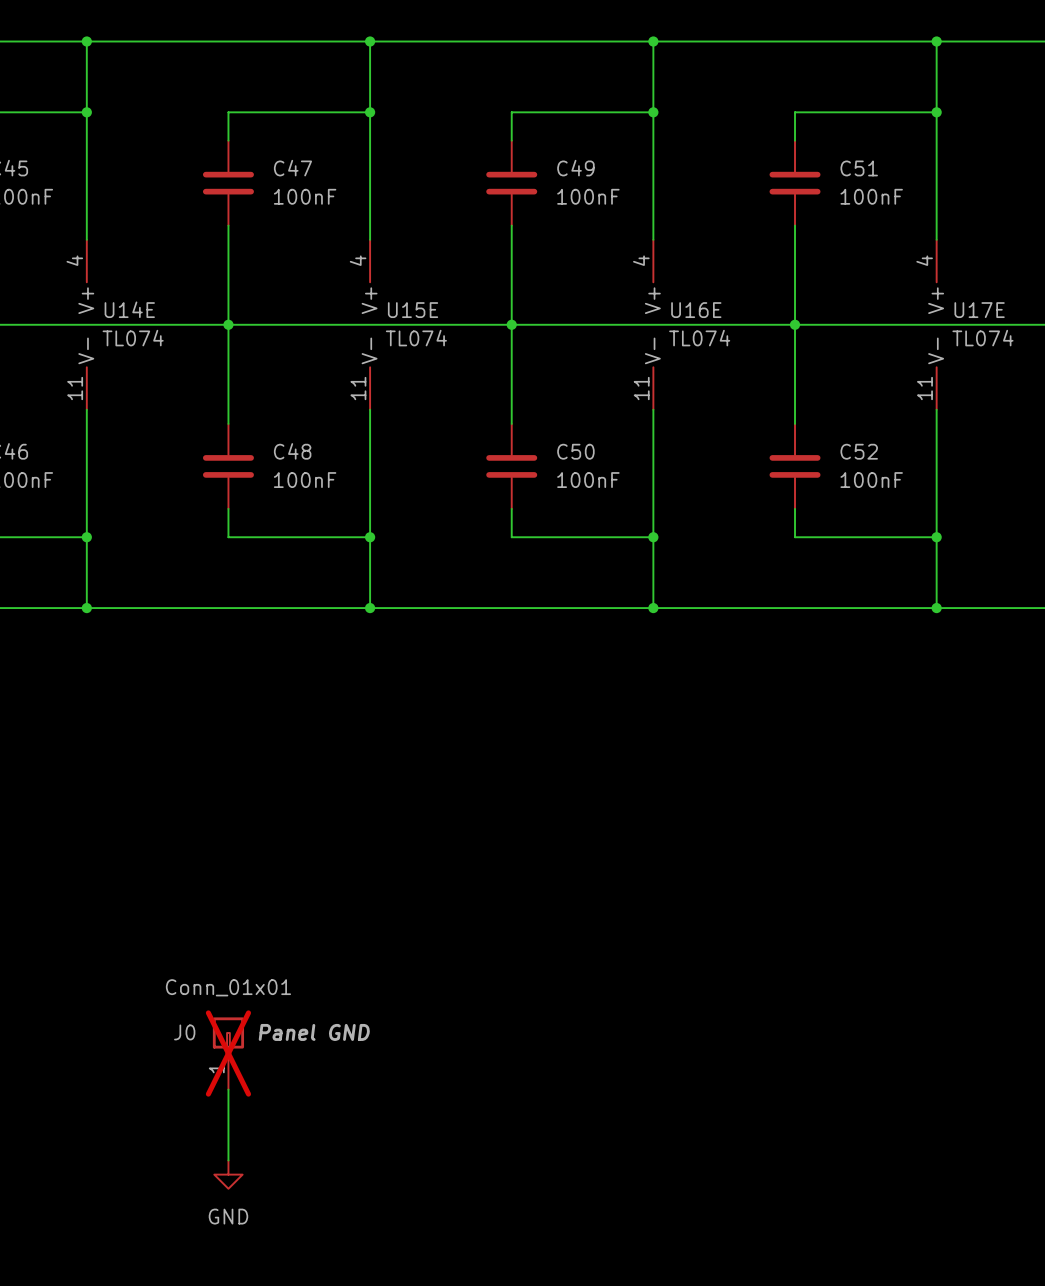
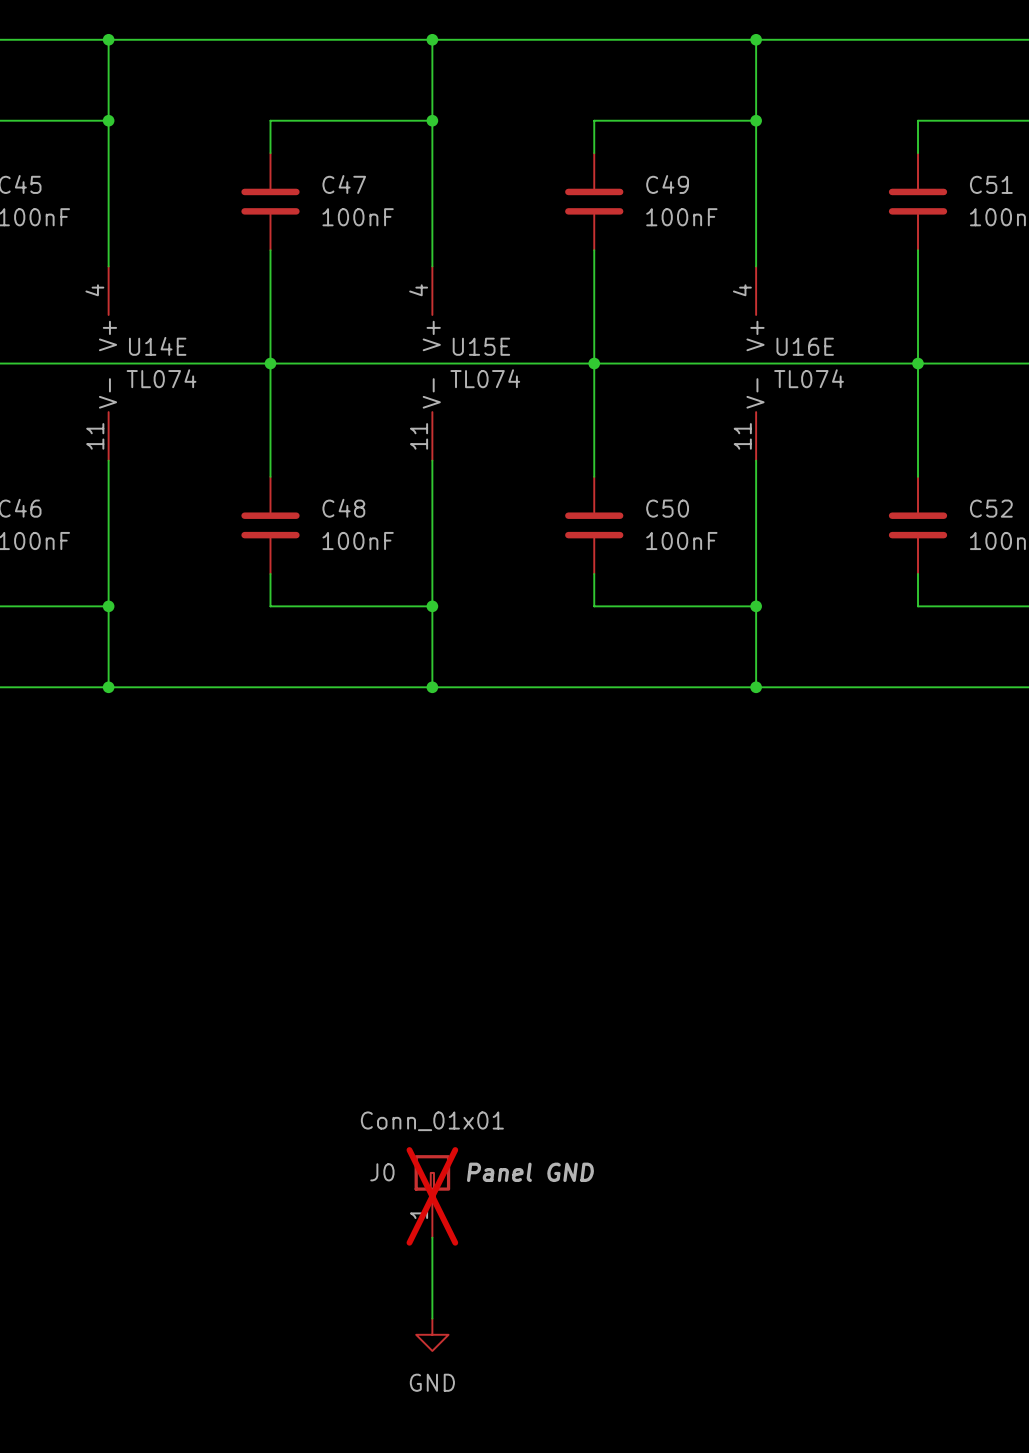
J0 position: (228, 1053) -> (432, 1196)
wire: (228, 1089) (228, 1160) -> (432, 1237) (432, 1318)
power symbol position: GND (228, 1174) -> GND (432, 1334)

